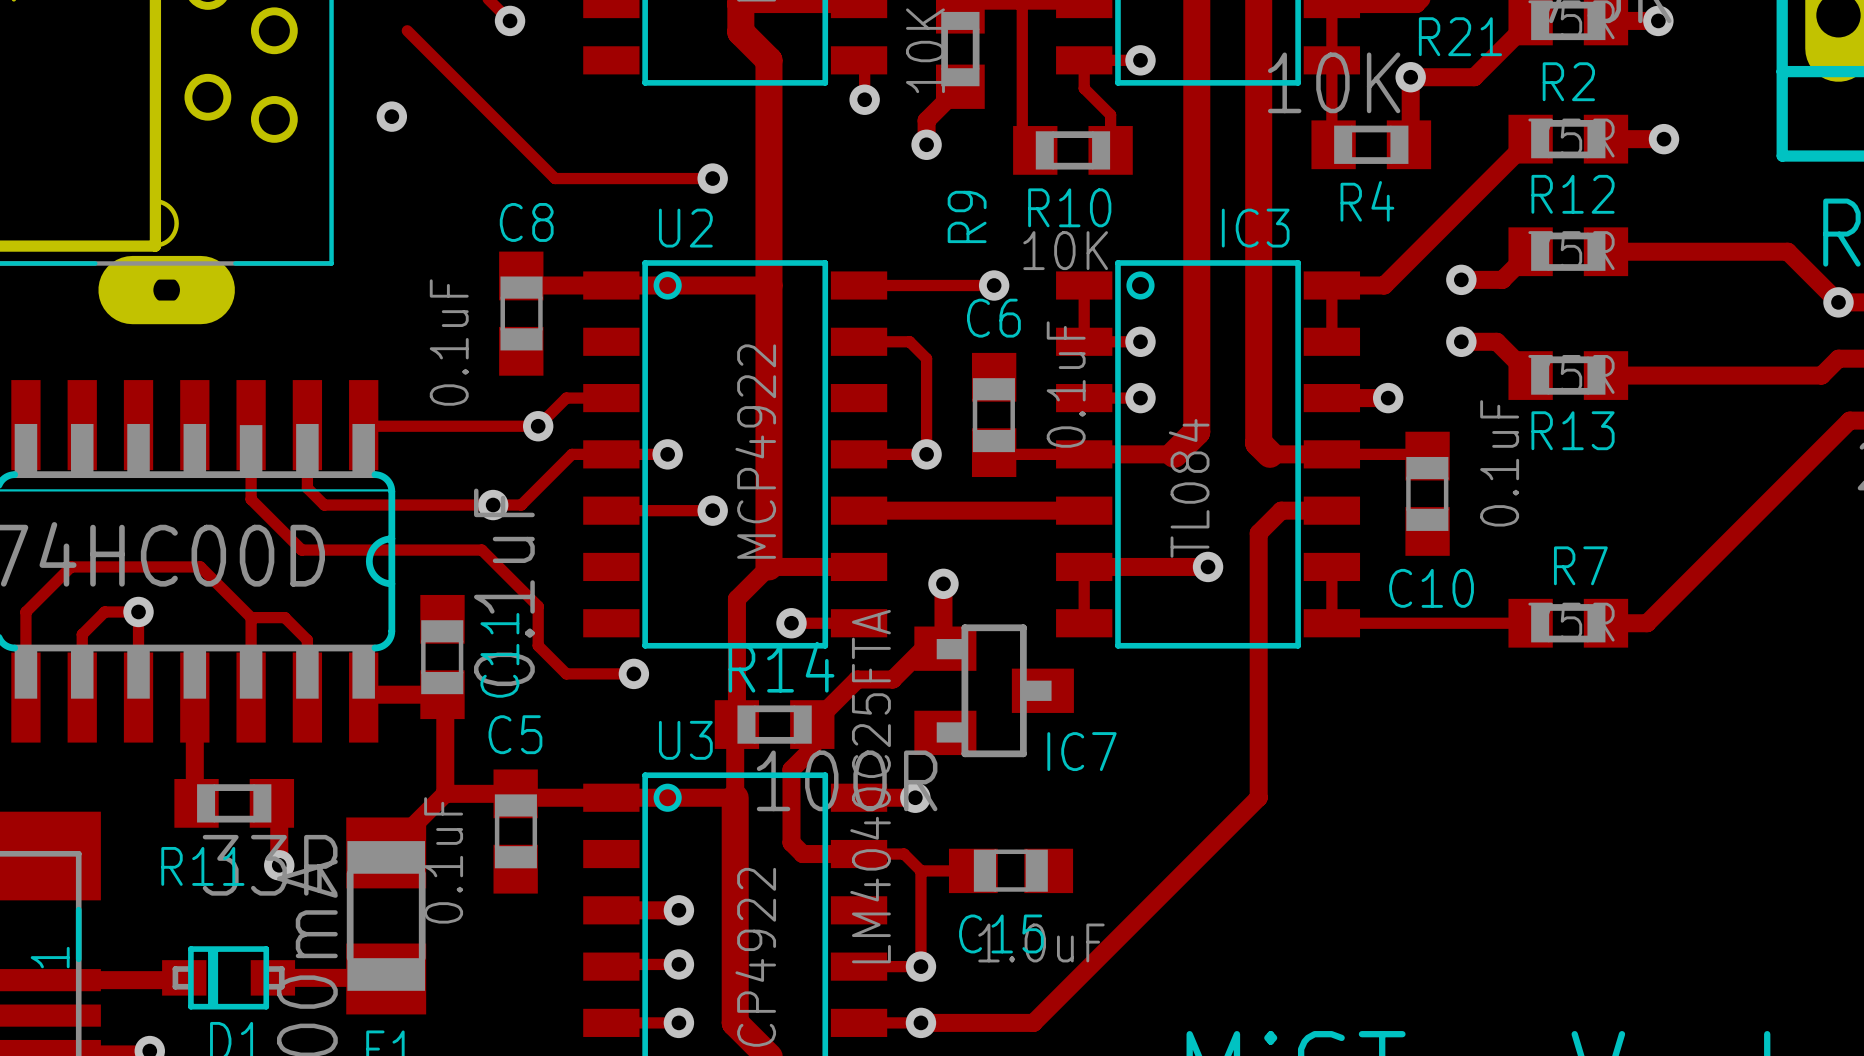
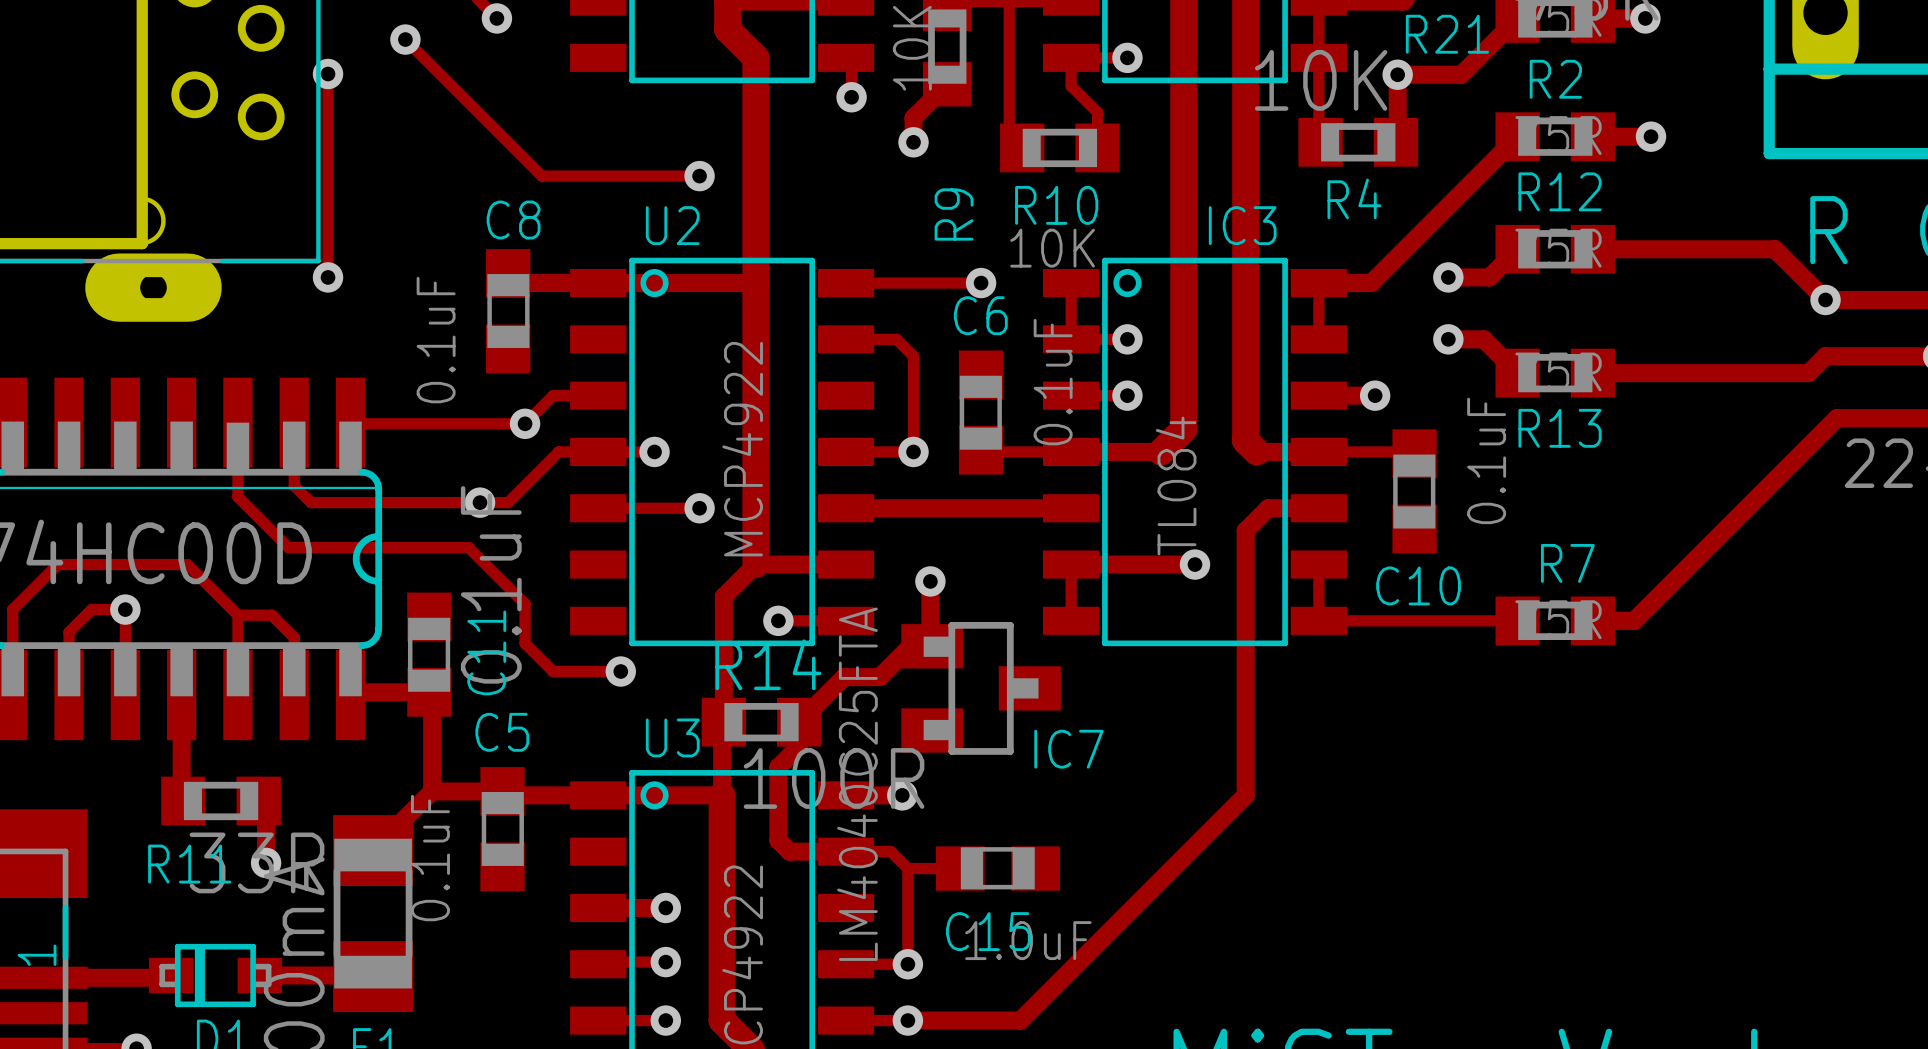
track: (407, 30) (418, 42) -> none
via: none -> (405, 39)
track: none -> (328, 74) (328, 277)
via: none -> (328, 74)
via: (391, 116) -> none
via: none -> (328, 277)

